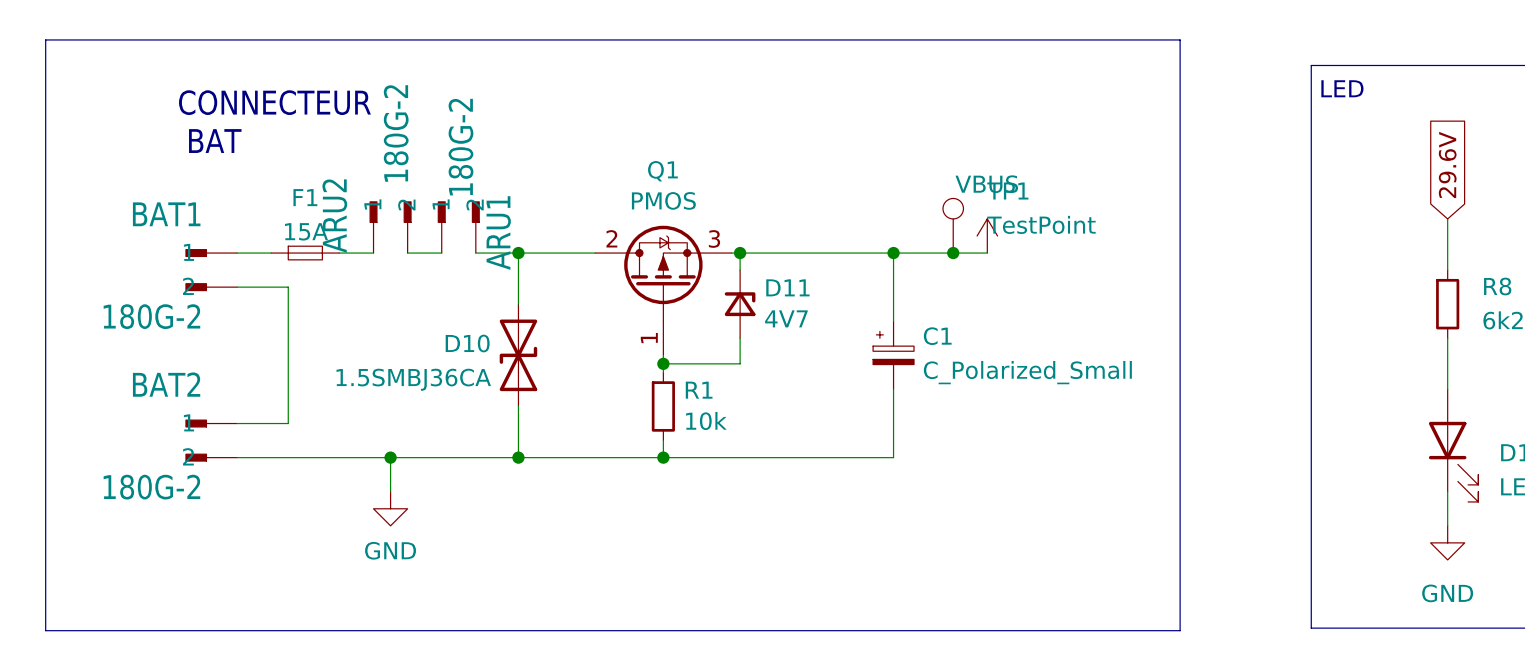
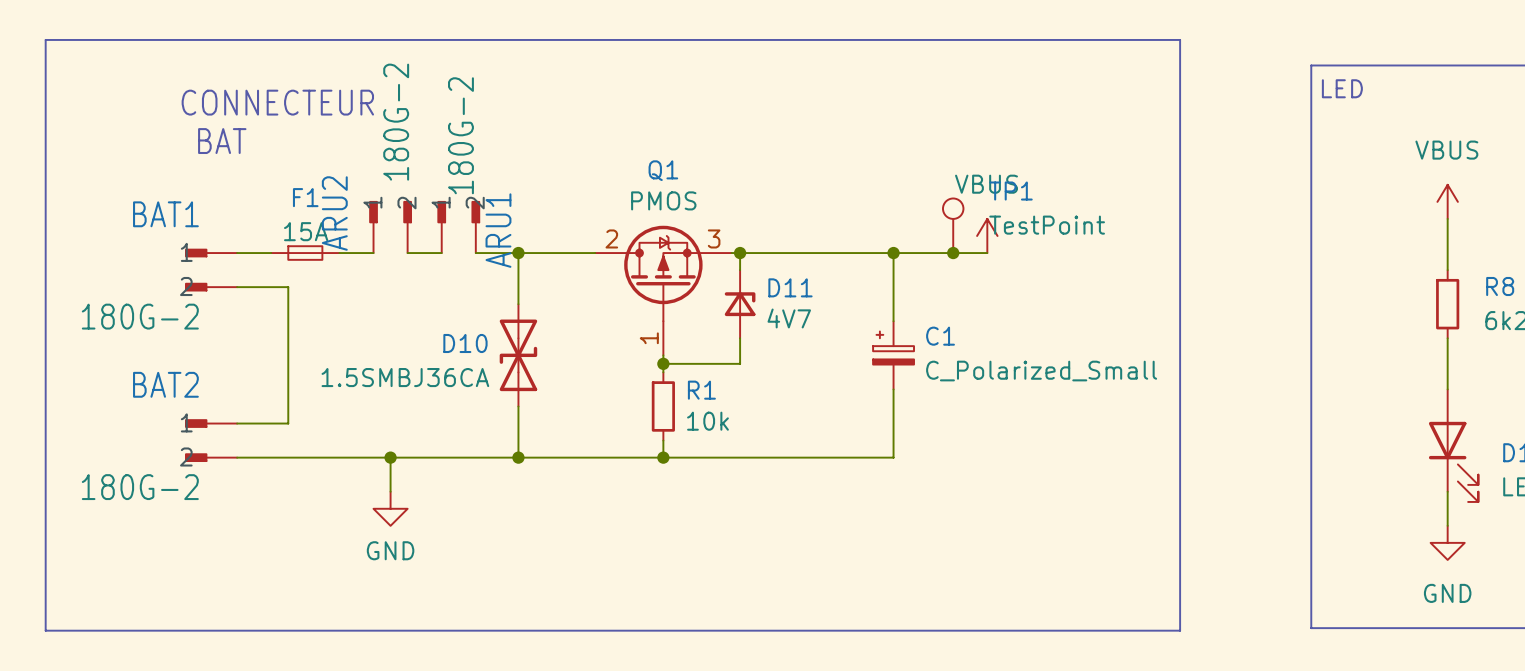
global label: 29.6V (1447, 164) -> none
power symbol: none -> VBUS (1447, 201)

